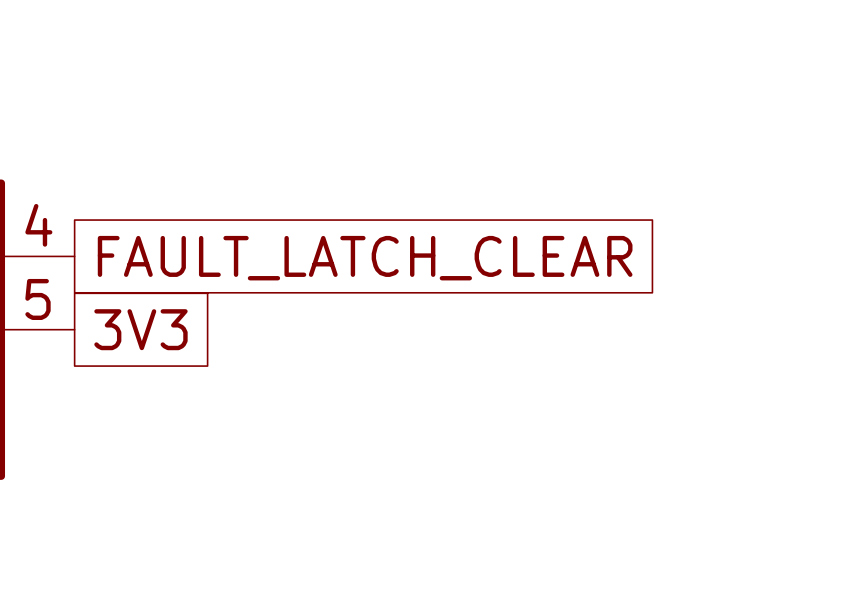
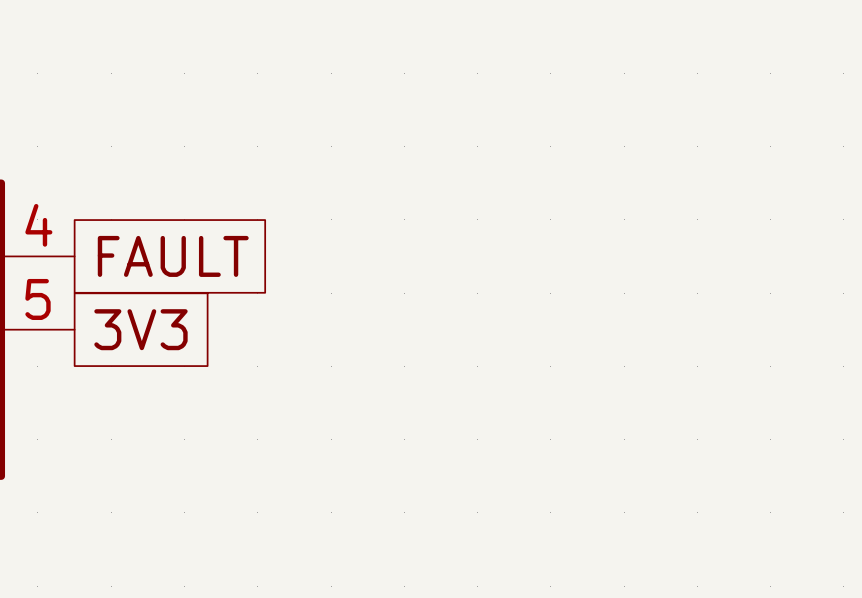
global label: FAULT_LATCH_CLEAR (365, 258) -> FAULT (173, 256)

